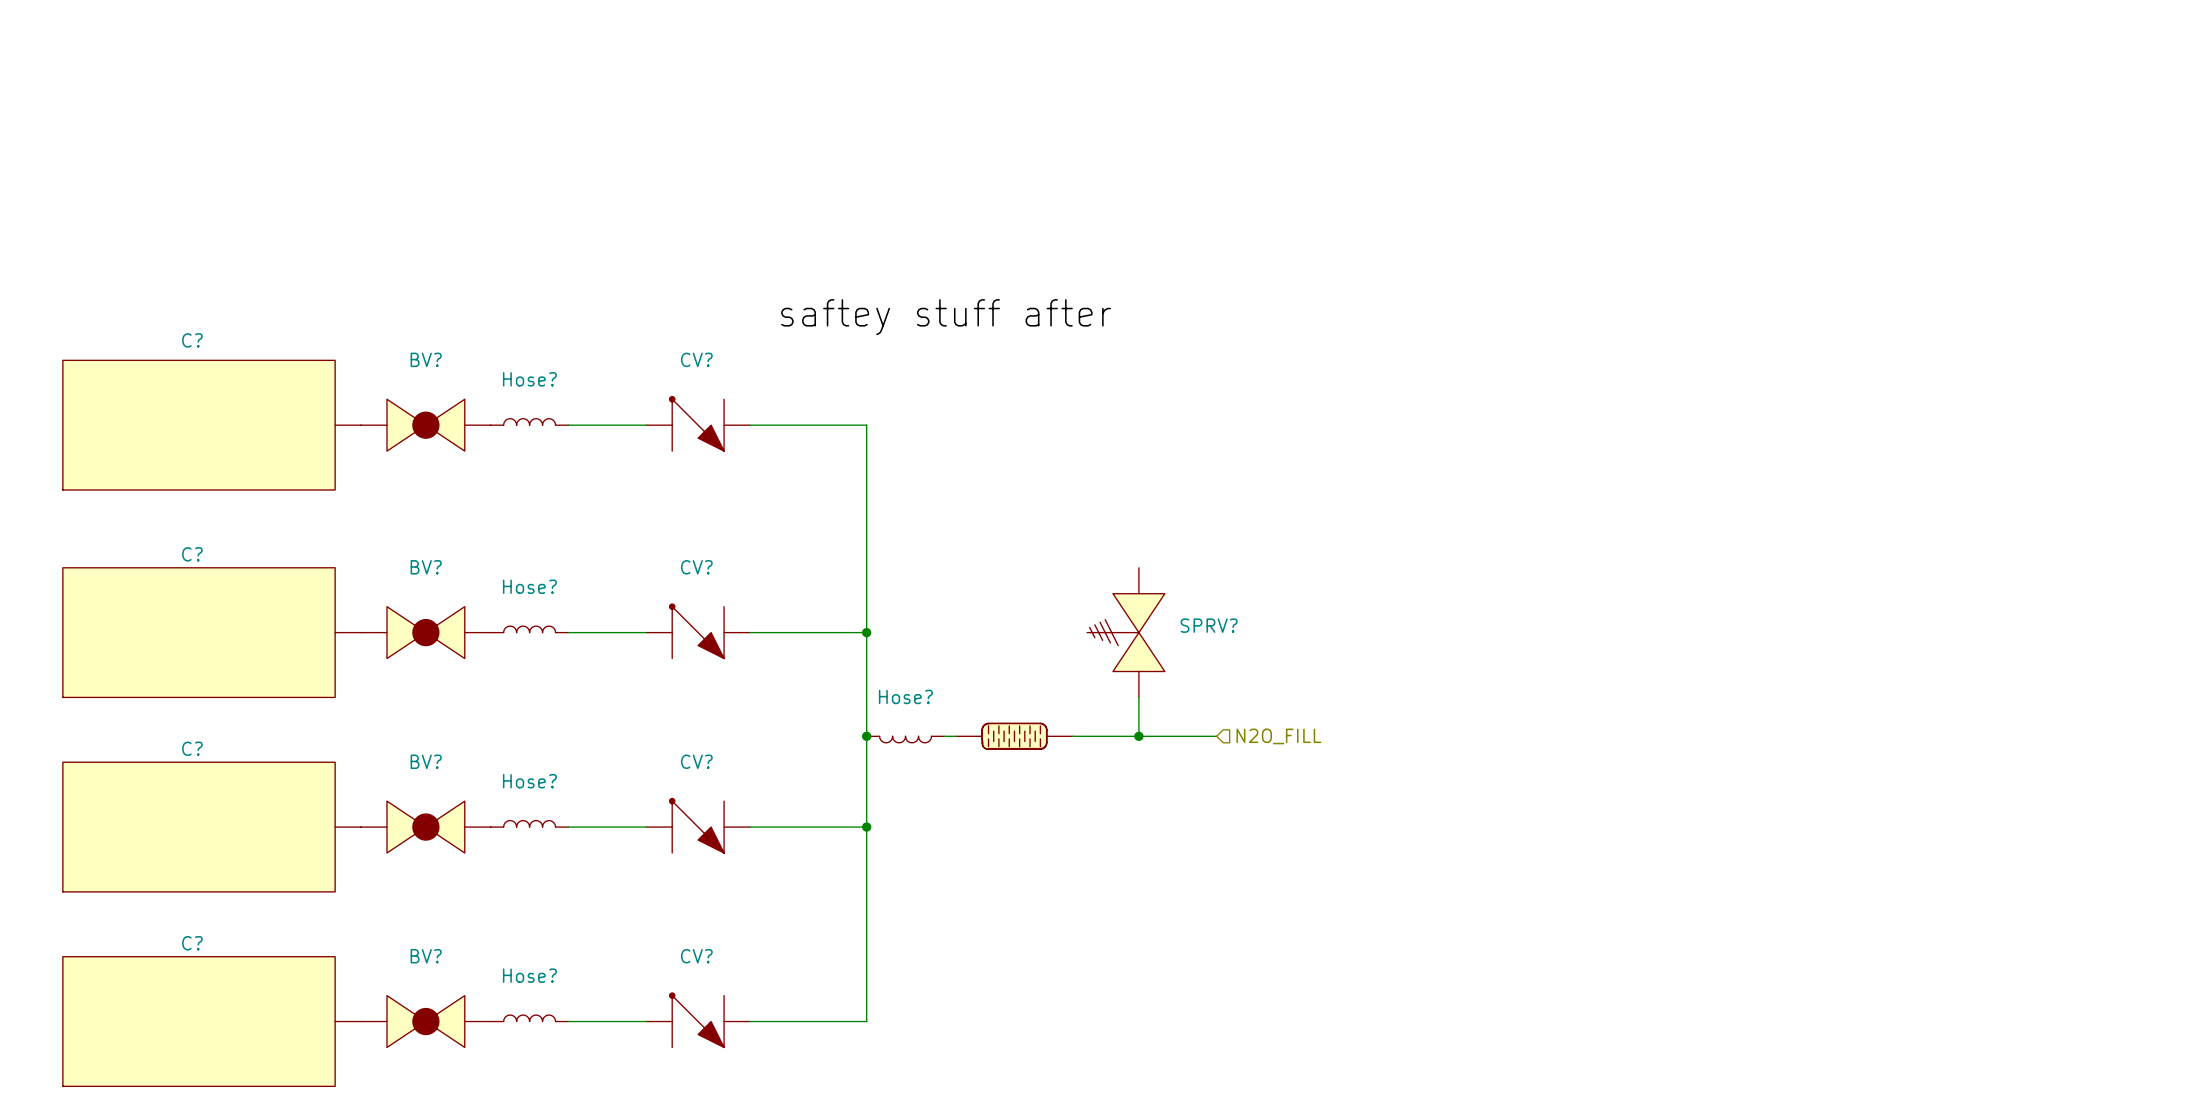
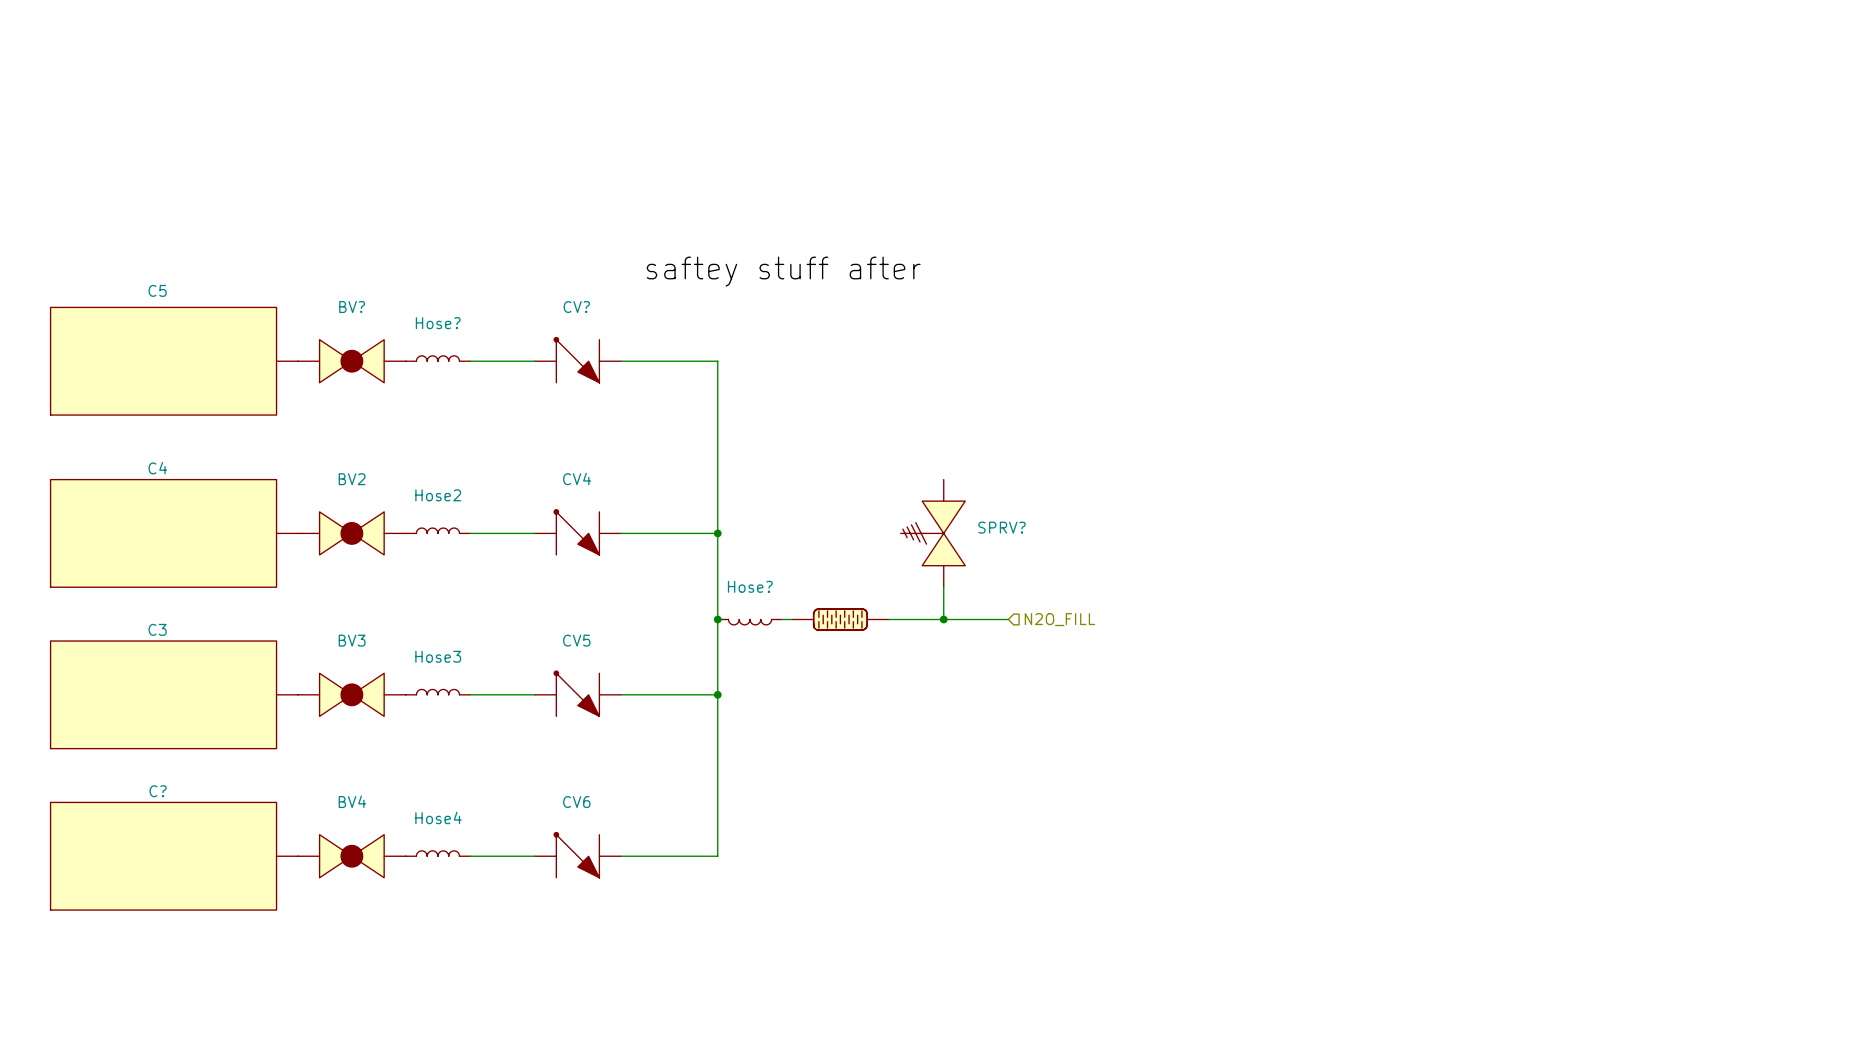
C? name: C? (192, 340) -> C5 (157, 290)
C? name: C? (192, 554) -> C4 (157, 468)
BV? name: BV? (426, 567) -> BV2 (352, 479)
CV? name: CV? (696, 567) -> CV4 (577, 478)
Hose? name: Hose? (529, 586) -> Hose2 (438, 495)
C? name: C? (192, 748) -> C3 (157, 629)
BV? name: BV? (426, 761) -> BV3 (352, 640)
CV? name: CV? (696, 761) -> CV5 (576, 640)
Hose? name: Hose? (529, 781) -> Hose3 (438, 656)
BV? name: BV? (426, 956) -> BV4 (352, 801)
CV? name: CV? (696, 956) -> CV6 (576, 802)
Hose? name: Hose? (529, 975) -> Hose4 (438, 817)

